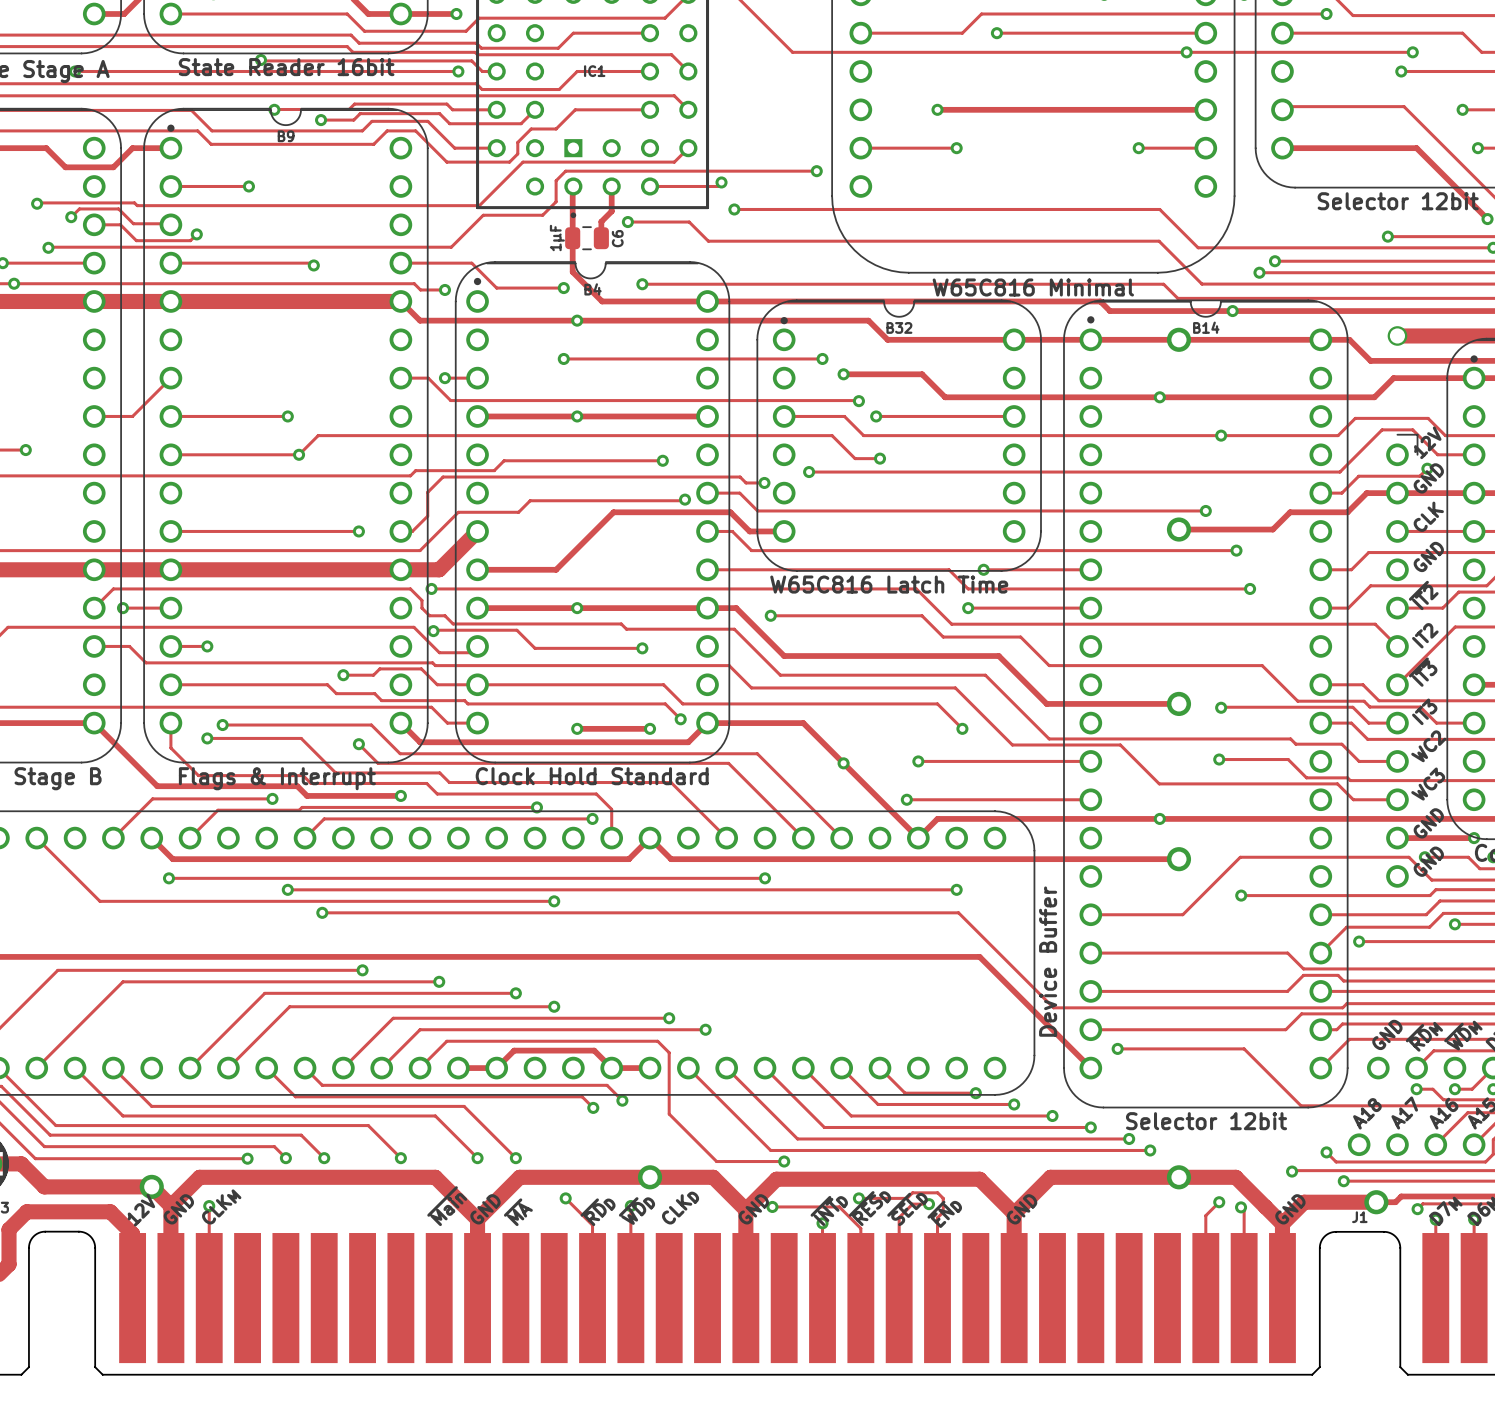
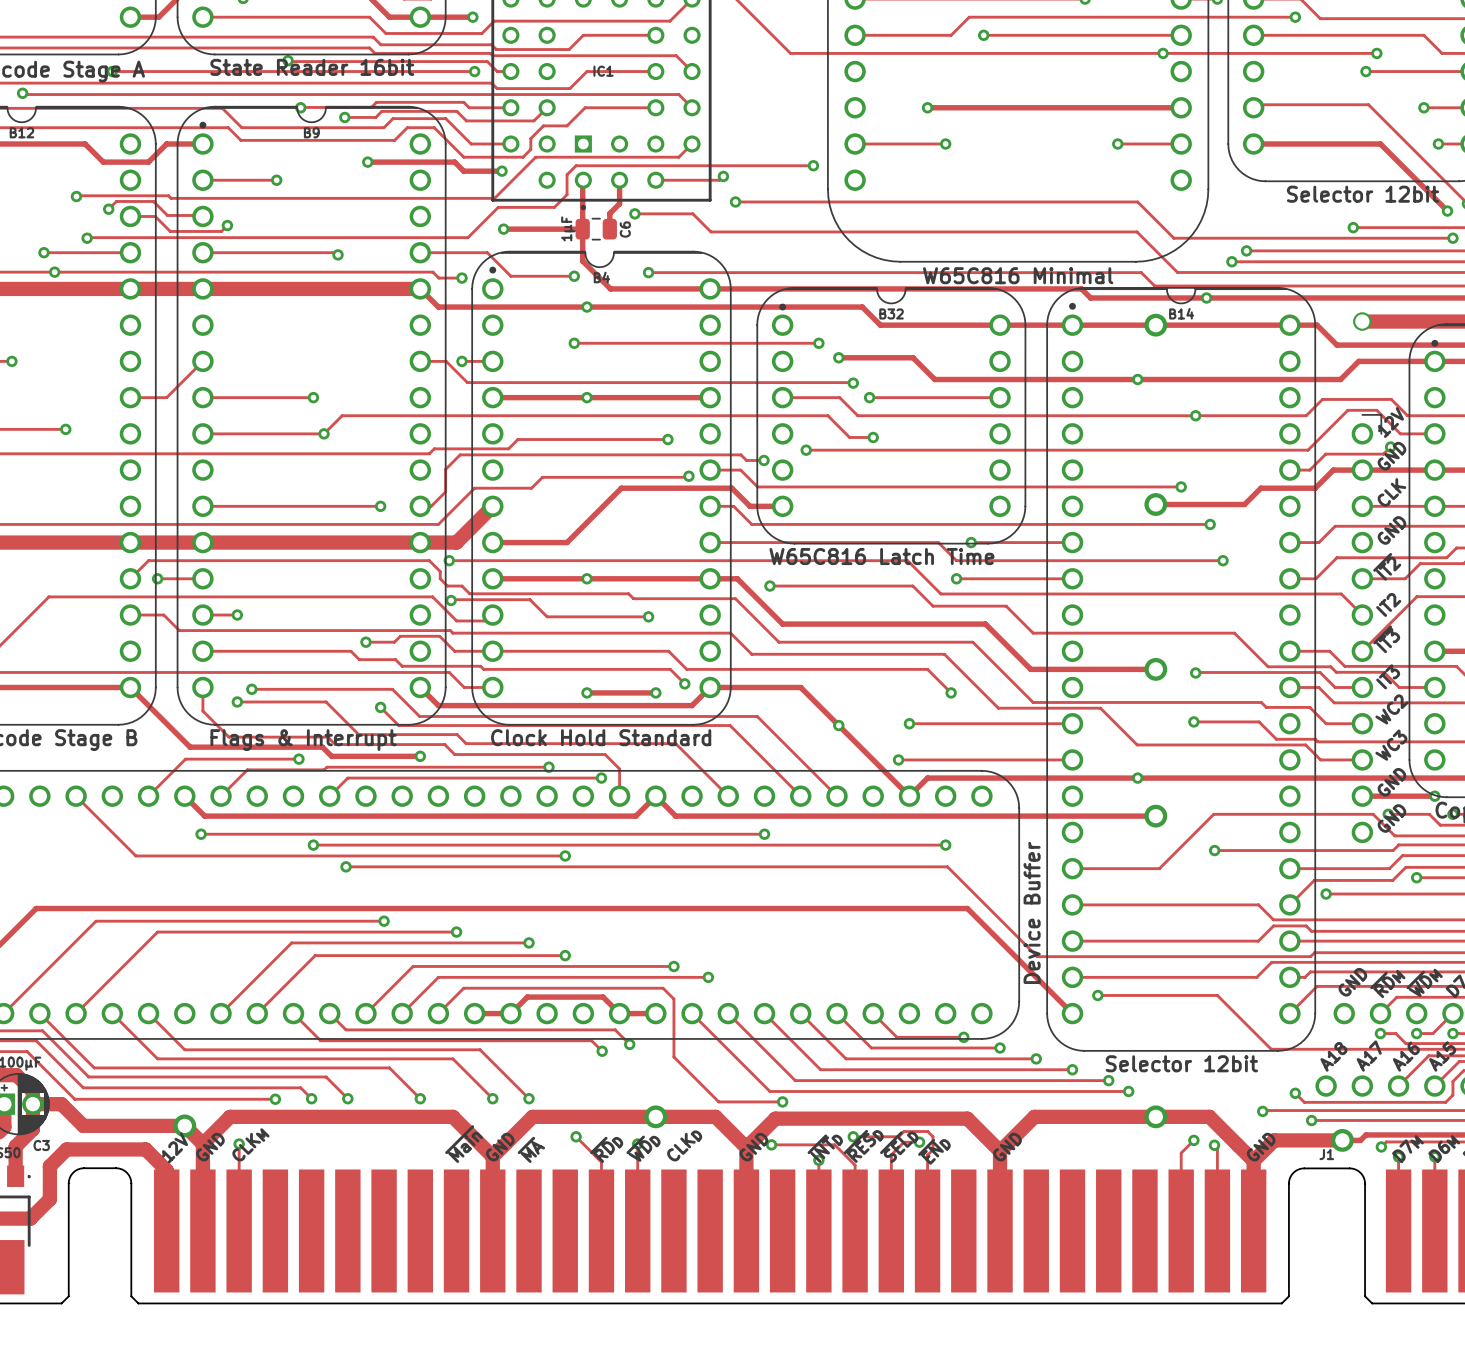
track: none -> (367, 162) (454, 162) (463, 171) (501, 171)
via: none -> (367, 162)
via: none -> (501, 171)
track: none -> (503, 229) (582, 229)
via: none -> (503, 229)

